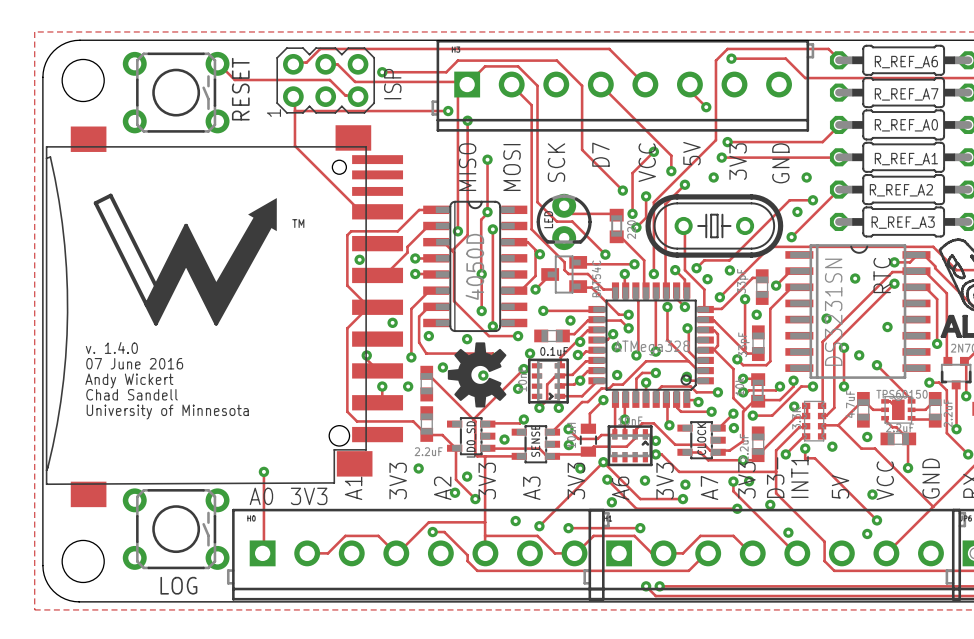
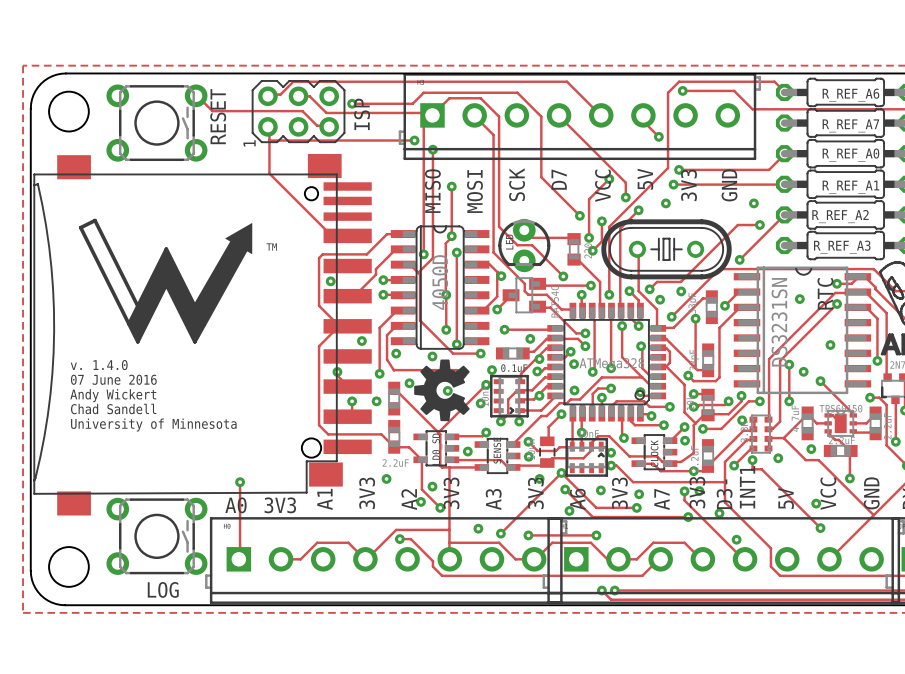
via: (797, 211) -> none
via: (756, 314) -> none
via: (826, 318) -> none
via: (867, 533) -> none

